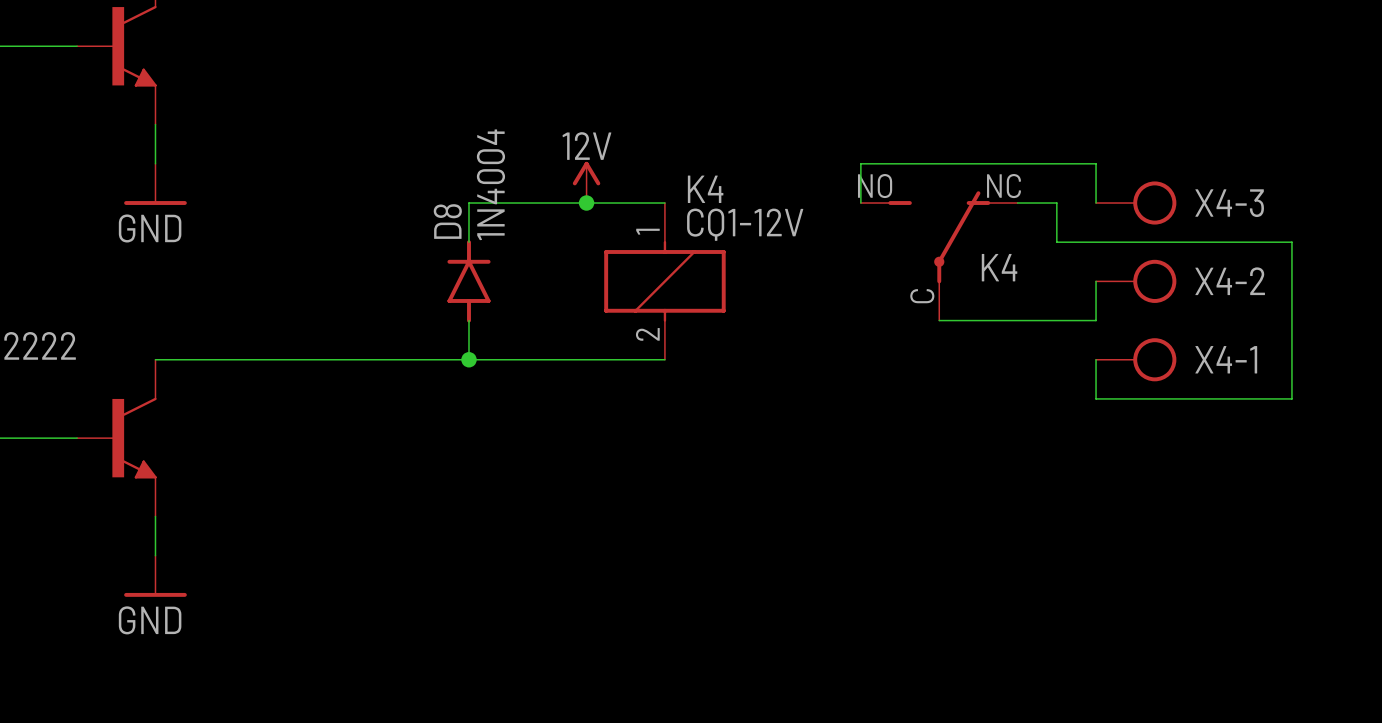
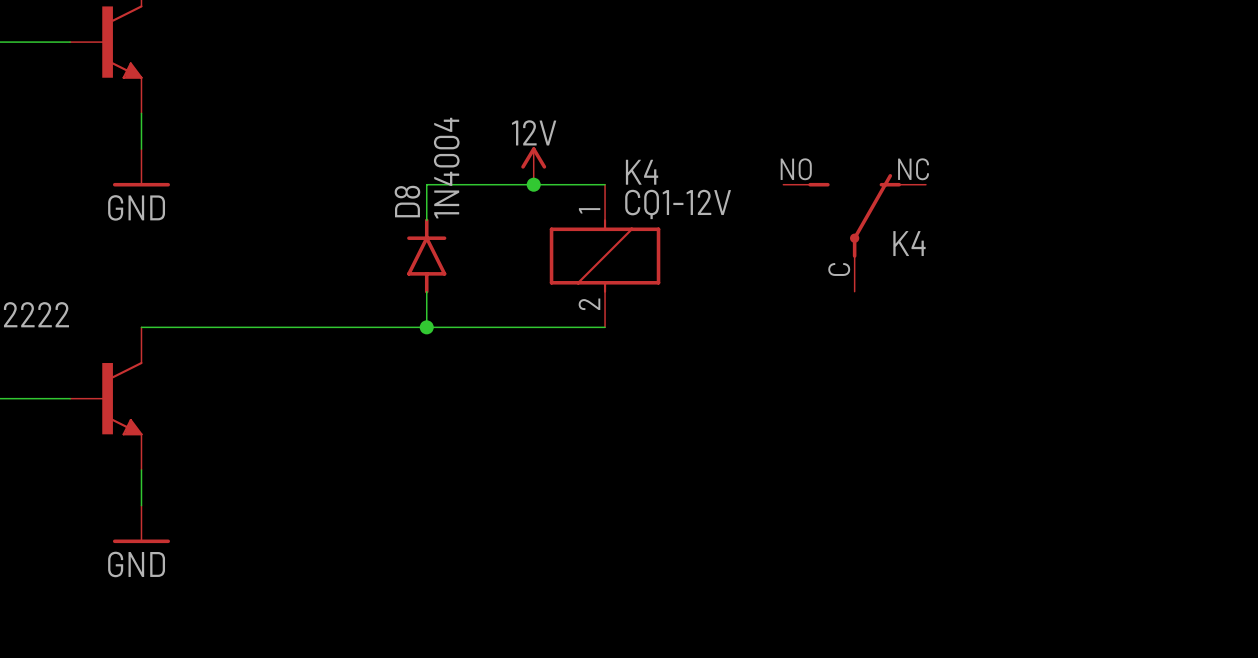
wire: (860, 203) (860, 163) (1096, 163) (1096, 203) -> none
wire: (1017, 203) (1056, 203) (1056, 242) (1291, 242) (1291, 398) (1096, 398) (1096, 359) -> none
X4-3: (1136, 203) -> none
wire: (1096, 281) (1096, 320) (939, 320) -> none
X4-2: (1136, 281) -> none
X4-1: (1136, 359) -> none

